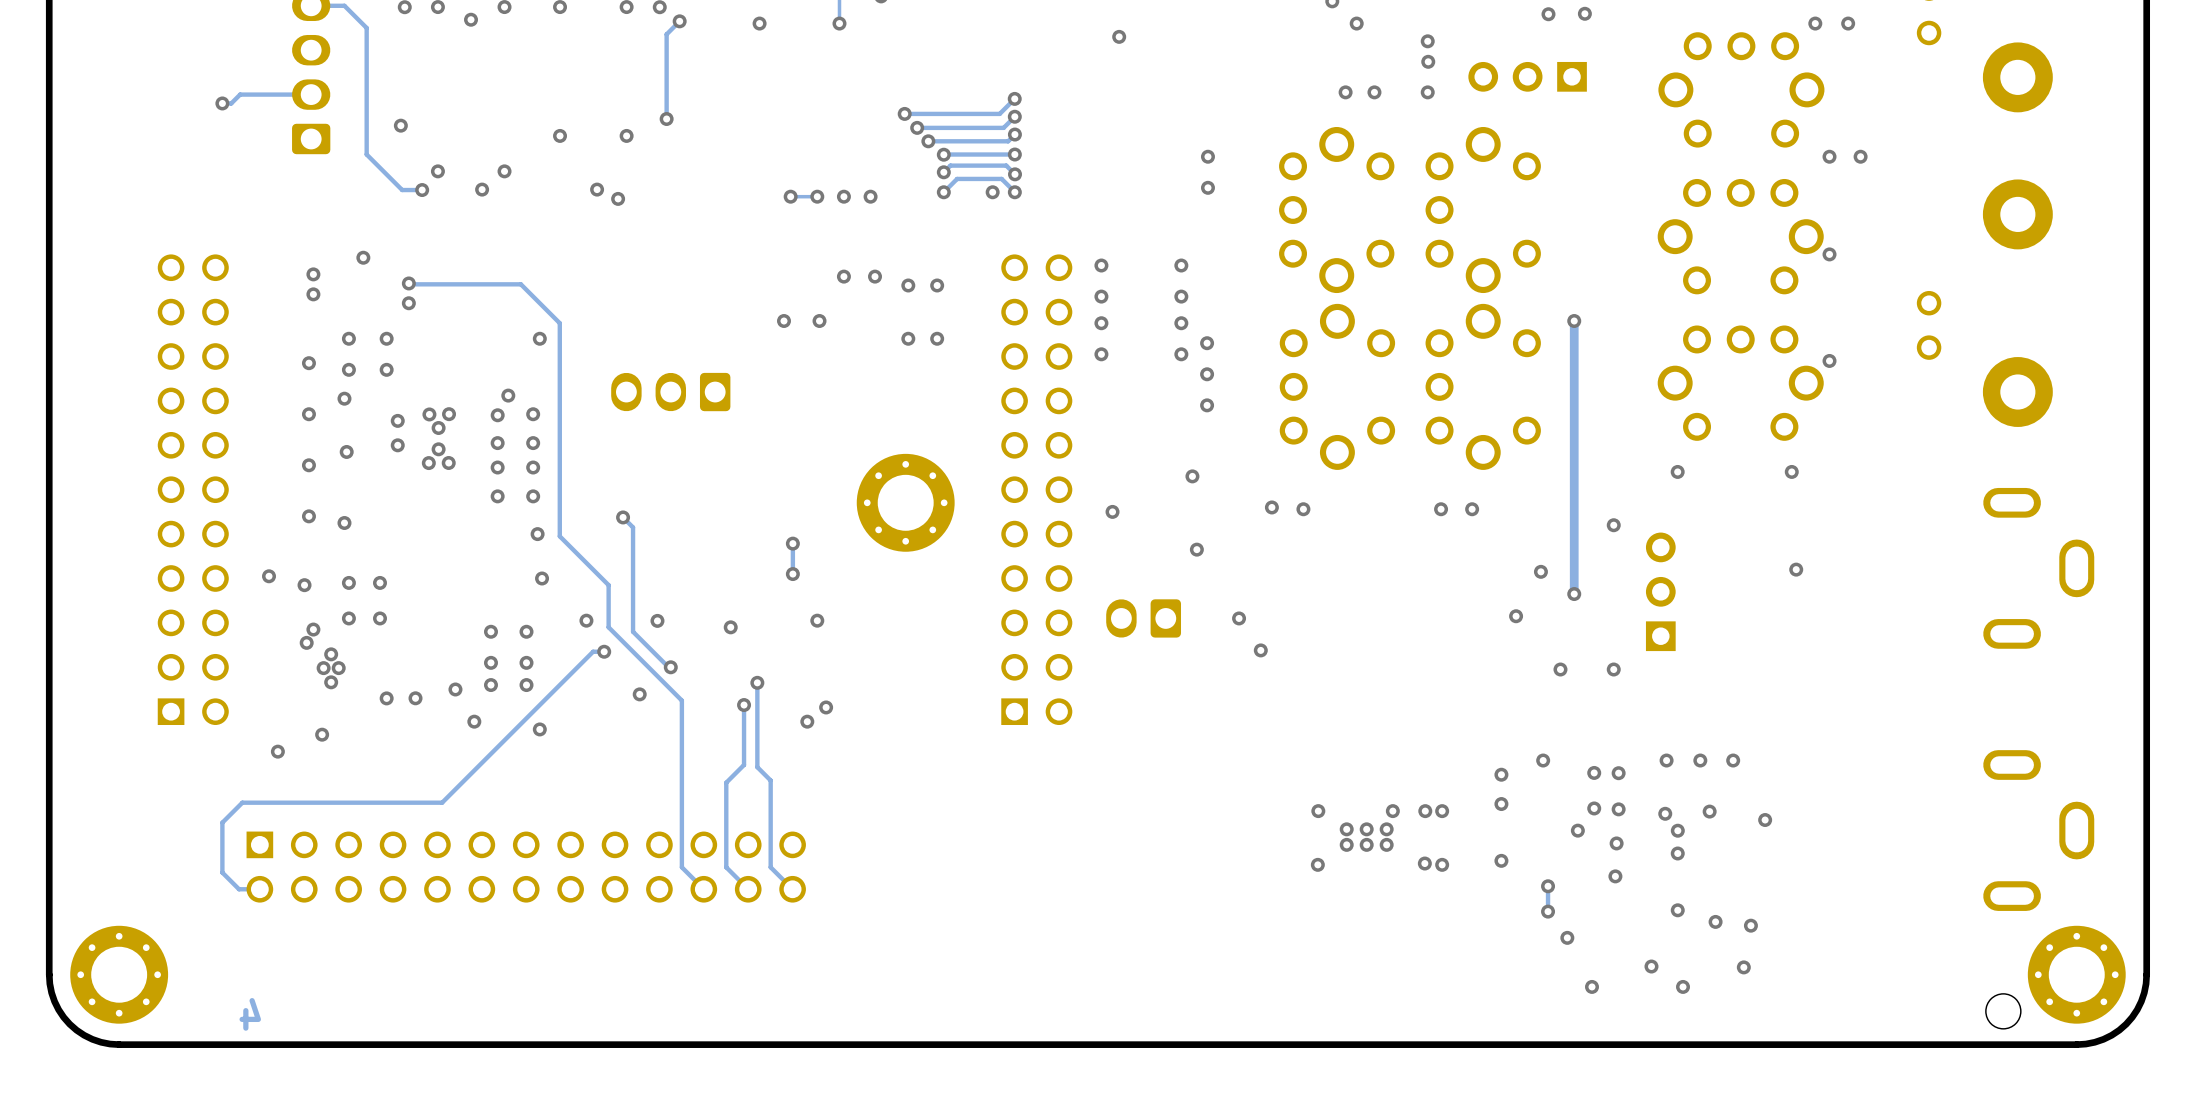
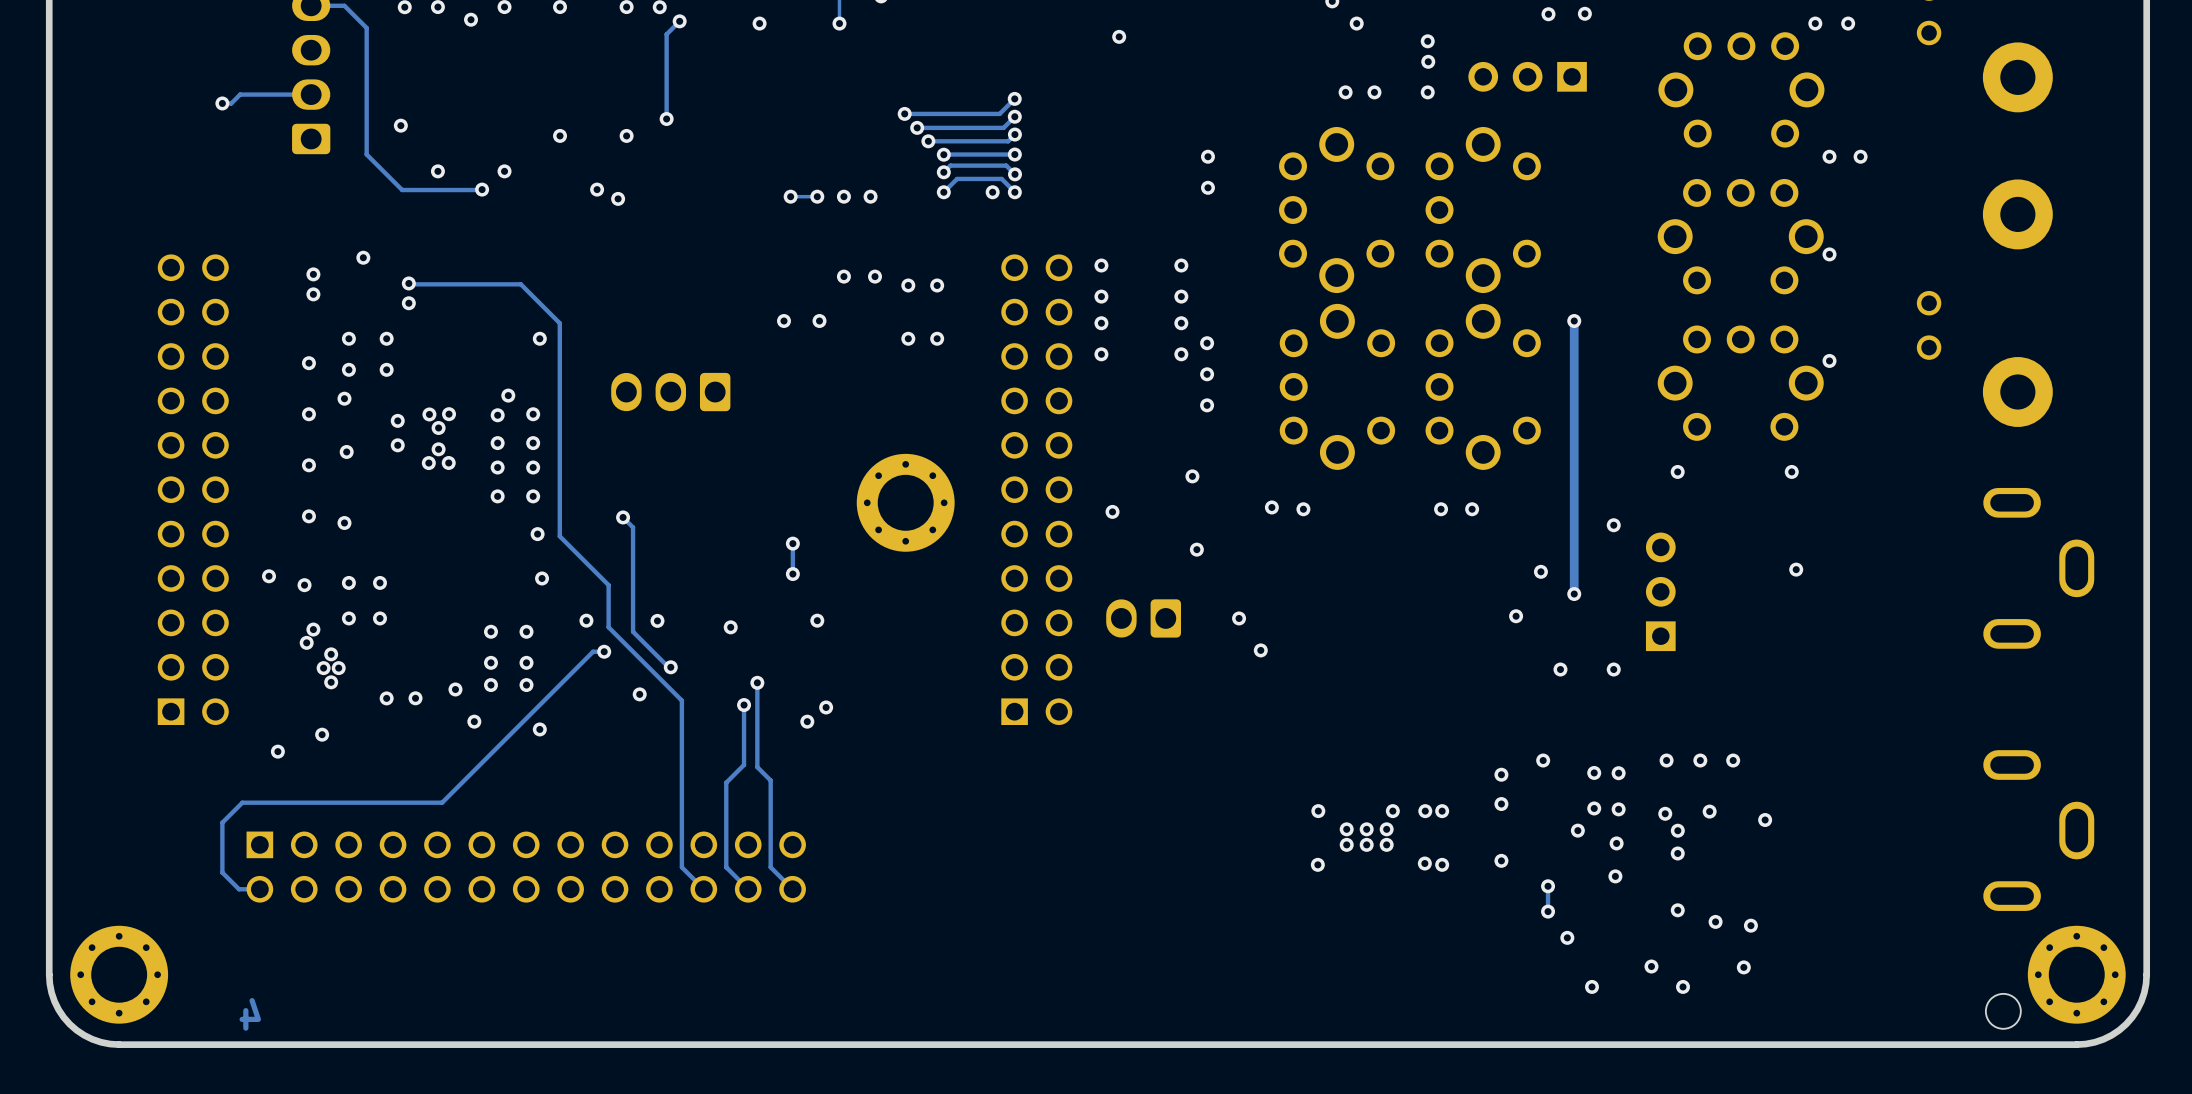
via: (422, 190) -> none
track: none -> (484, 190) (422, 190)

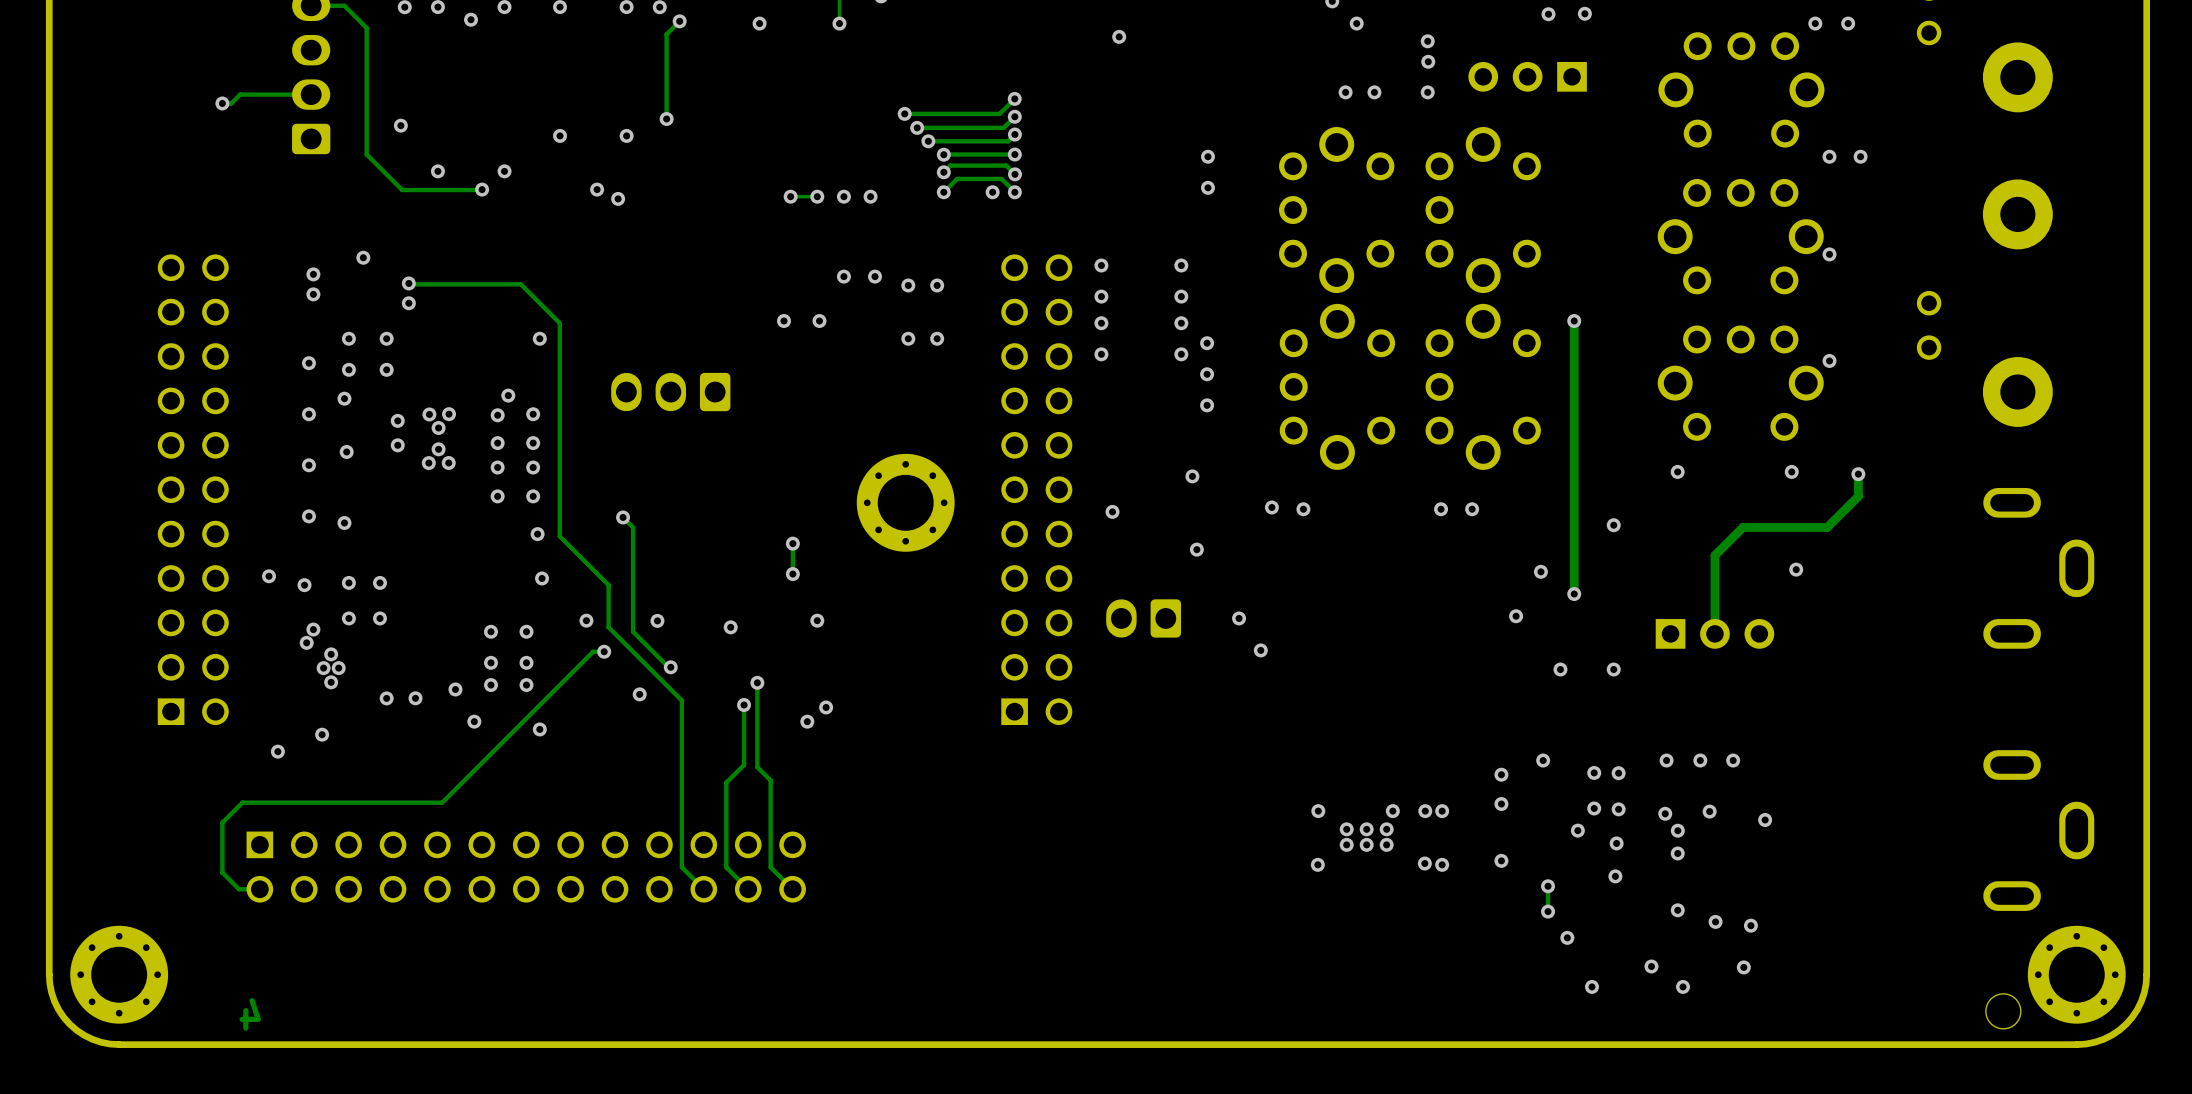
track: none -> (1858, 474) (1858, 496) (1827, 527) (1742, 527) (1714, 555) (1714, 633)
via: none -> (1858, 474)
part rotation: 0° (1660, 591) -> 90° clockwise (1714, 633)

